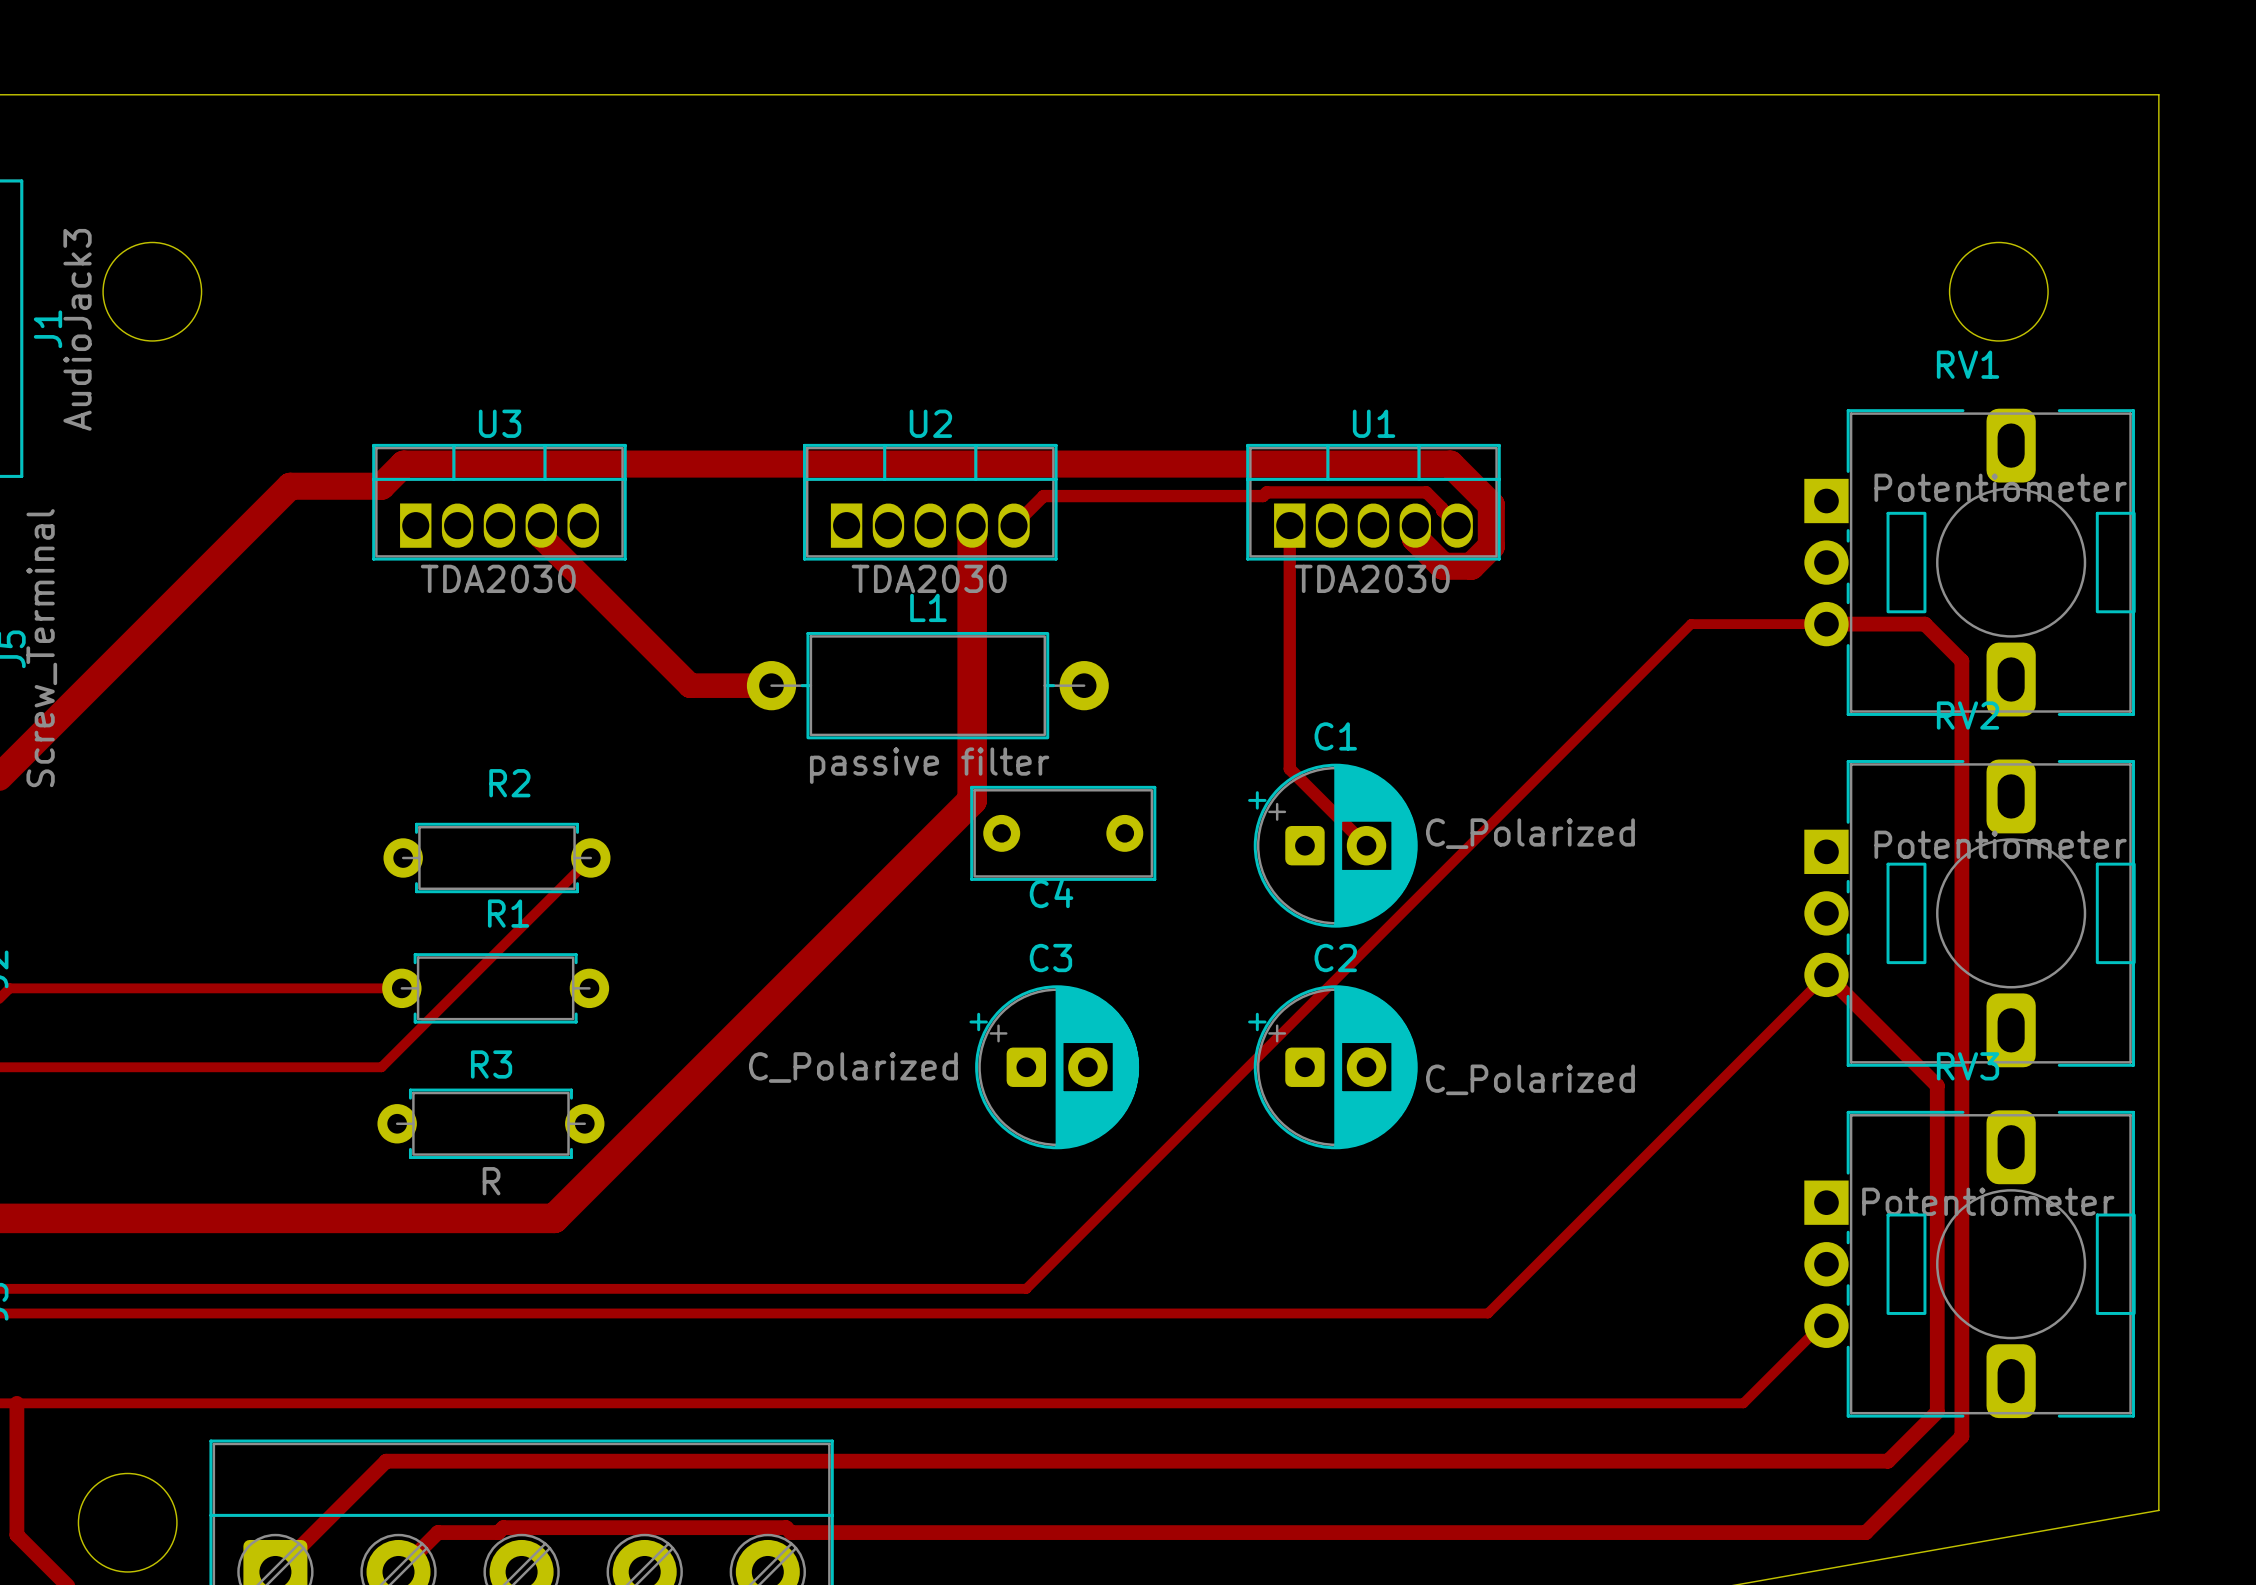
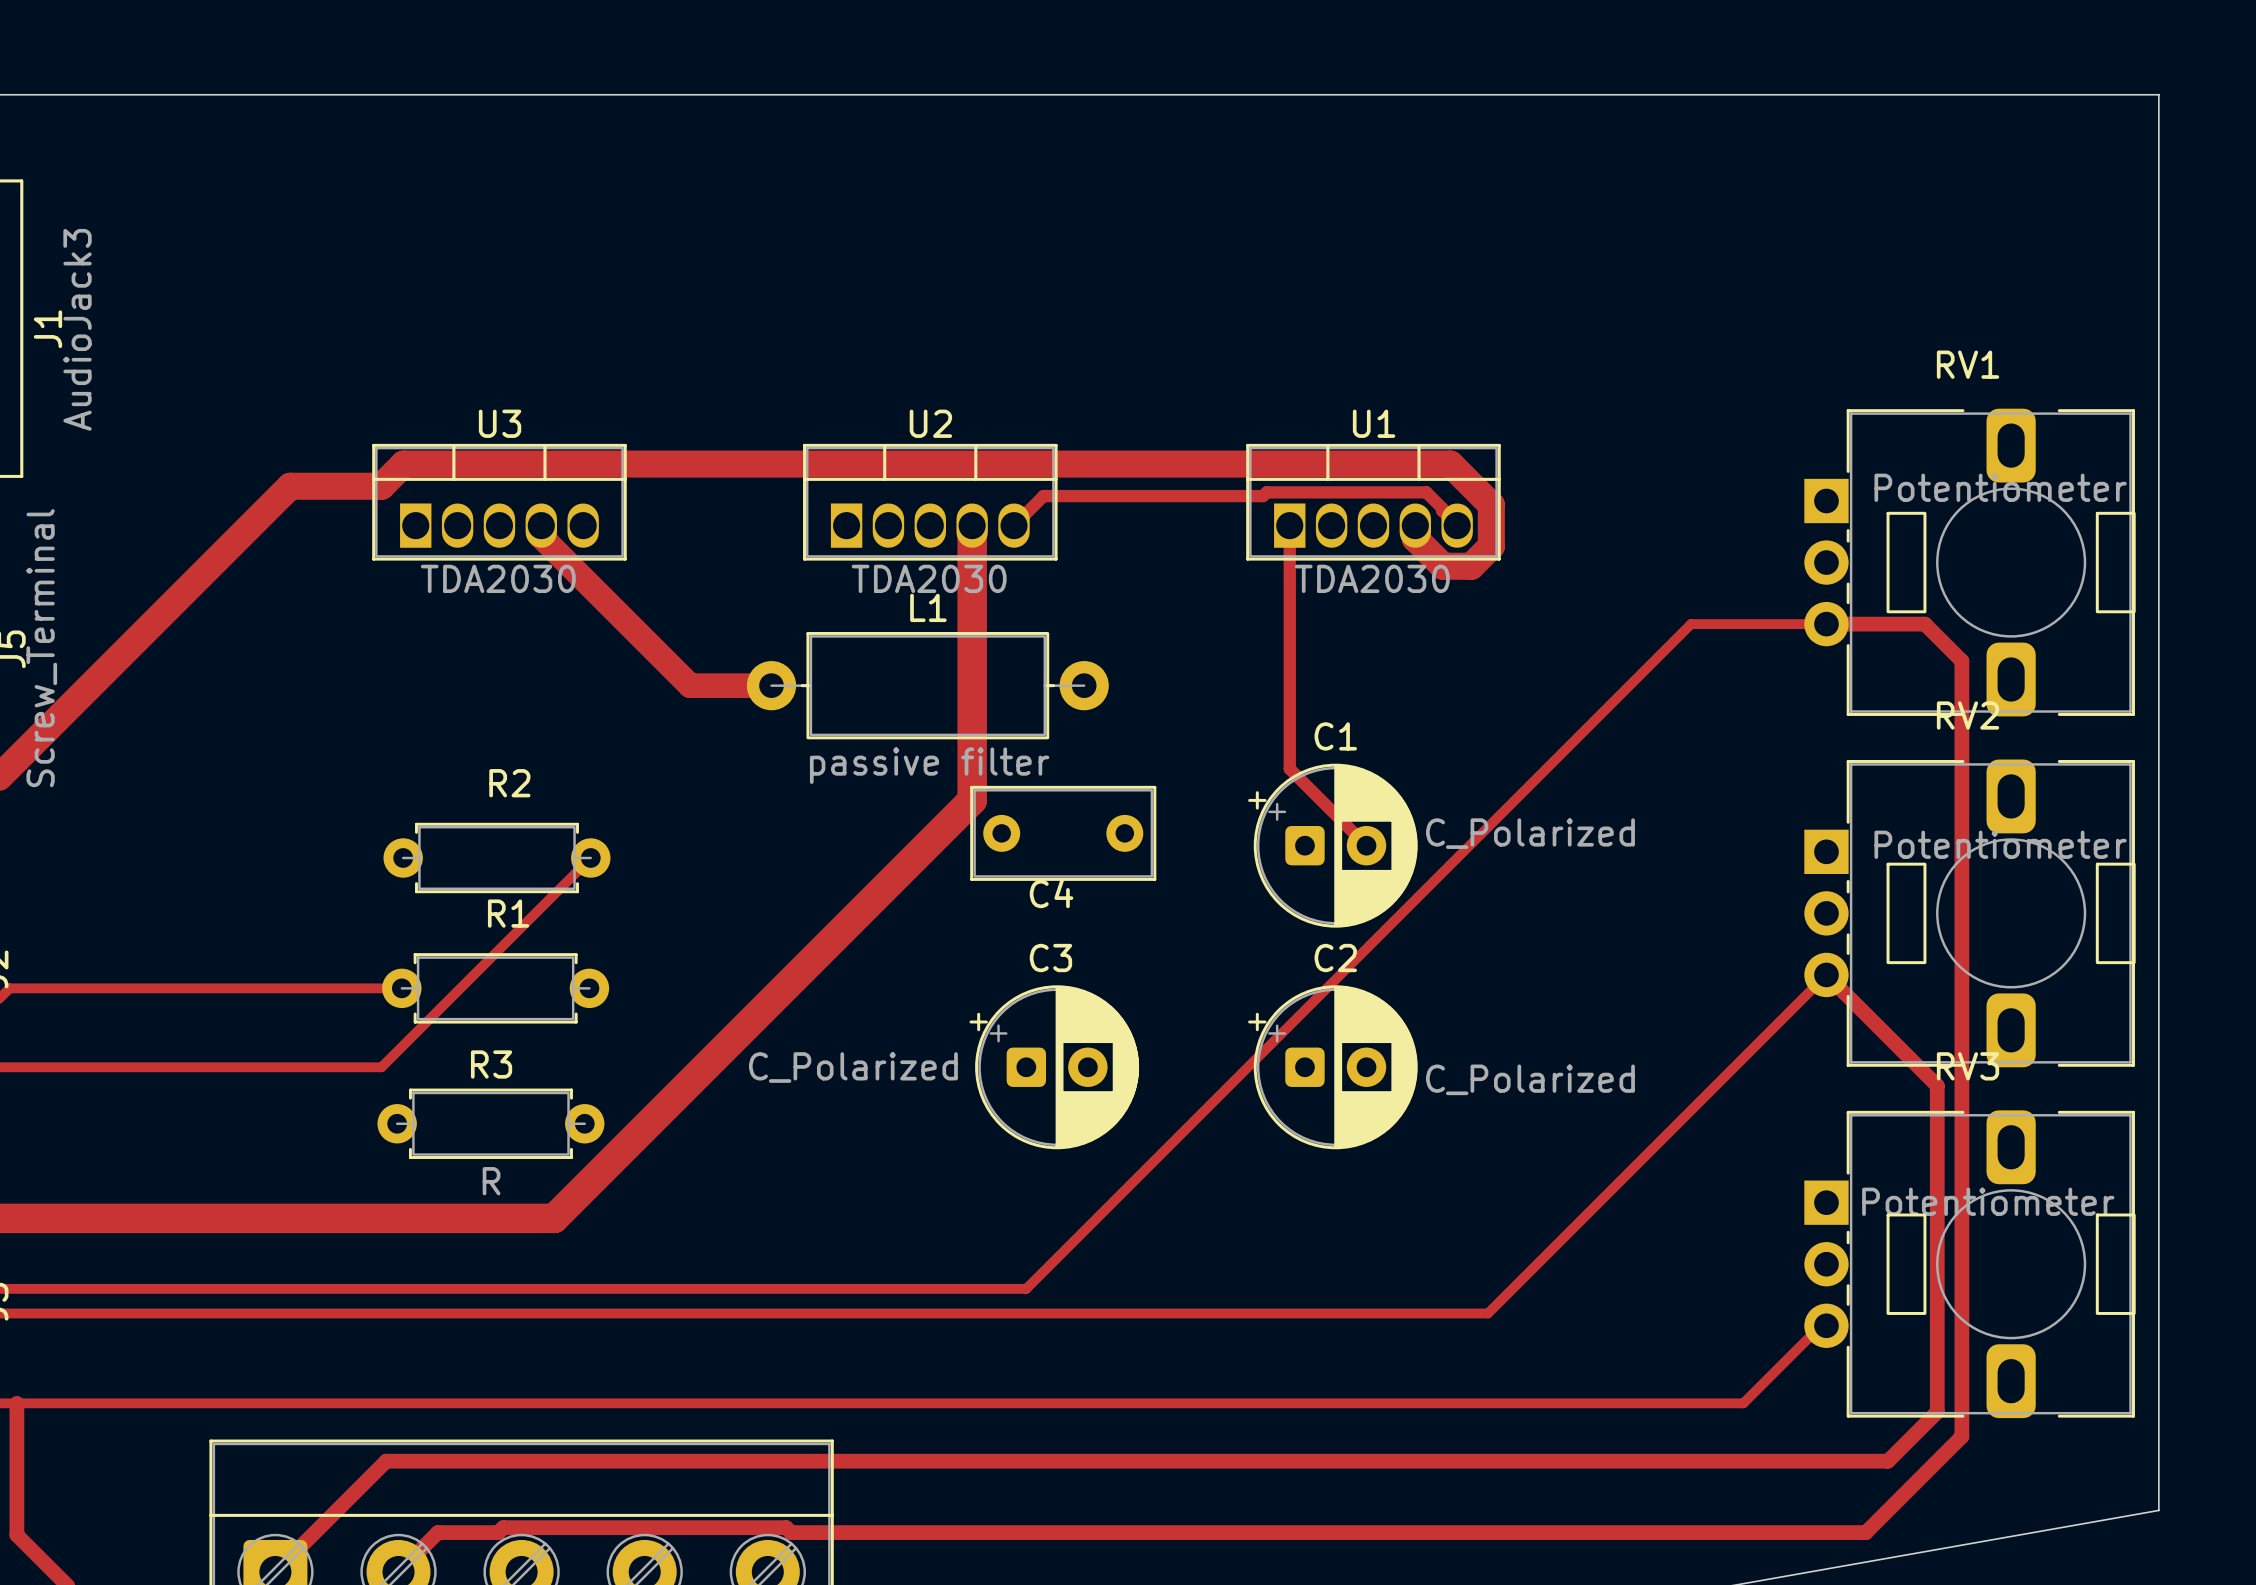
round board edge: [102, 241, 203, 342] -> none
round board edge: [1948, 241, 2049, 342] -> none
round board edge: [77, 1472, 178, 1573] -> none

